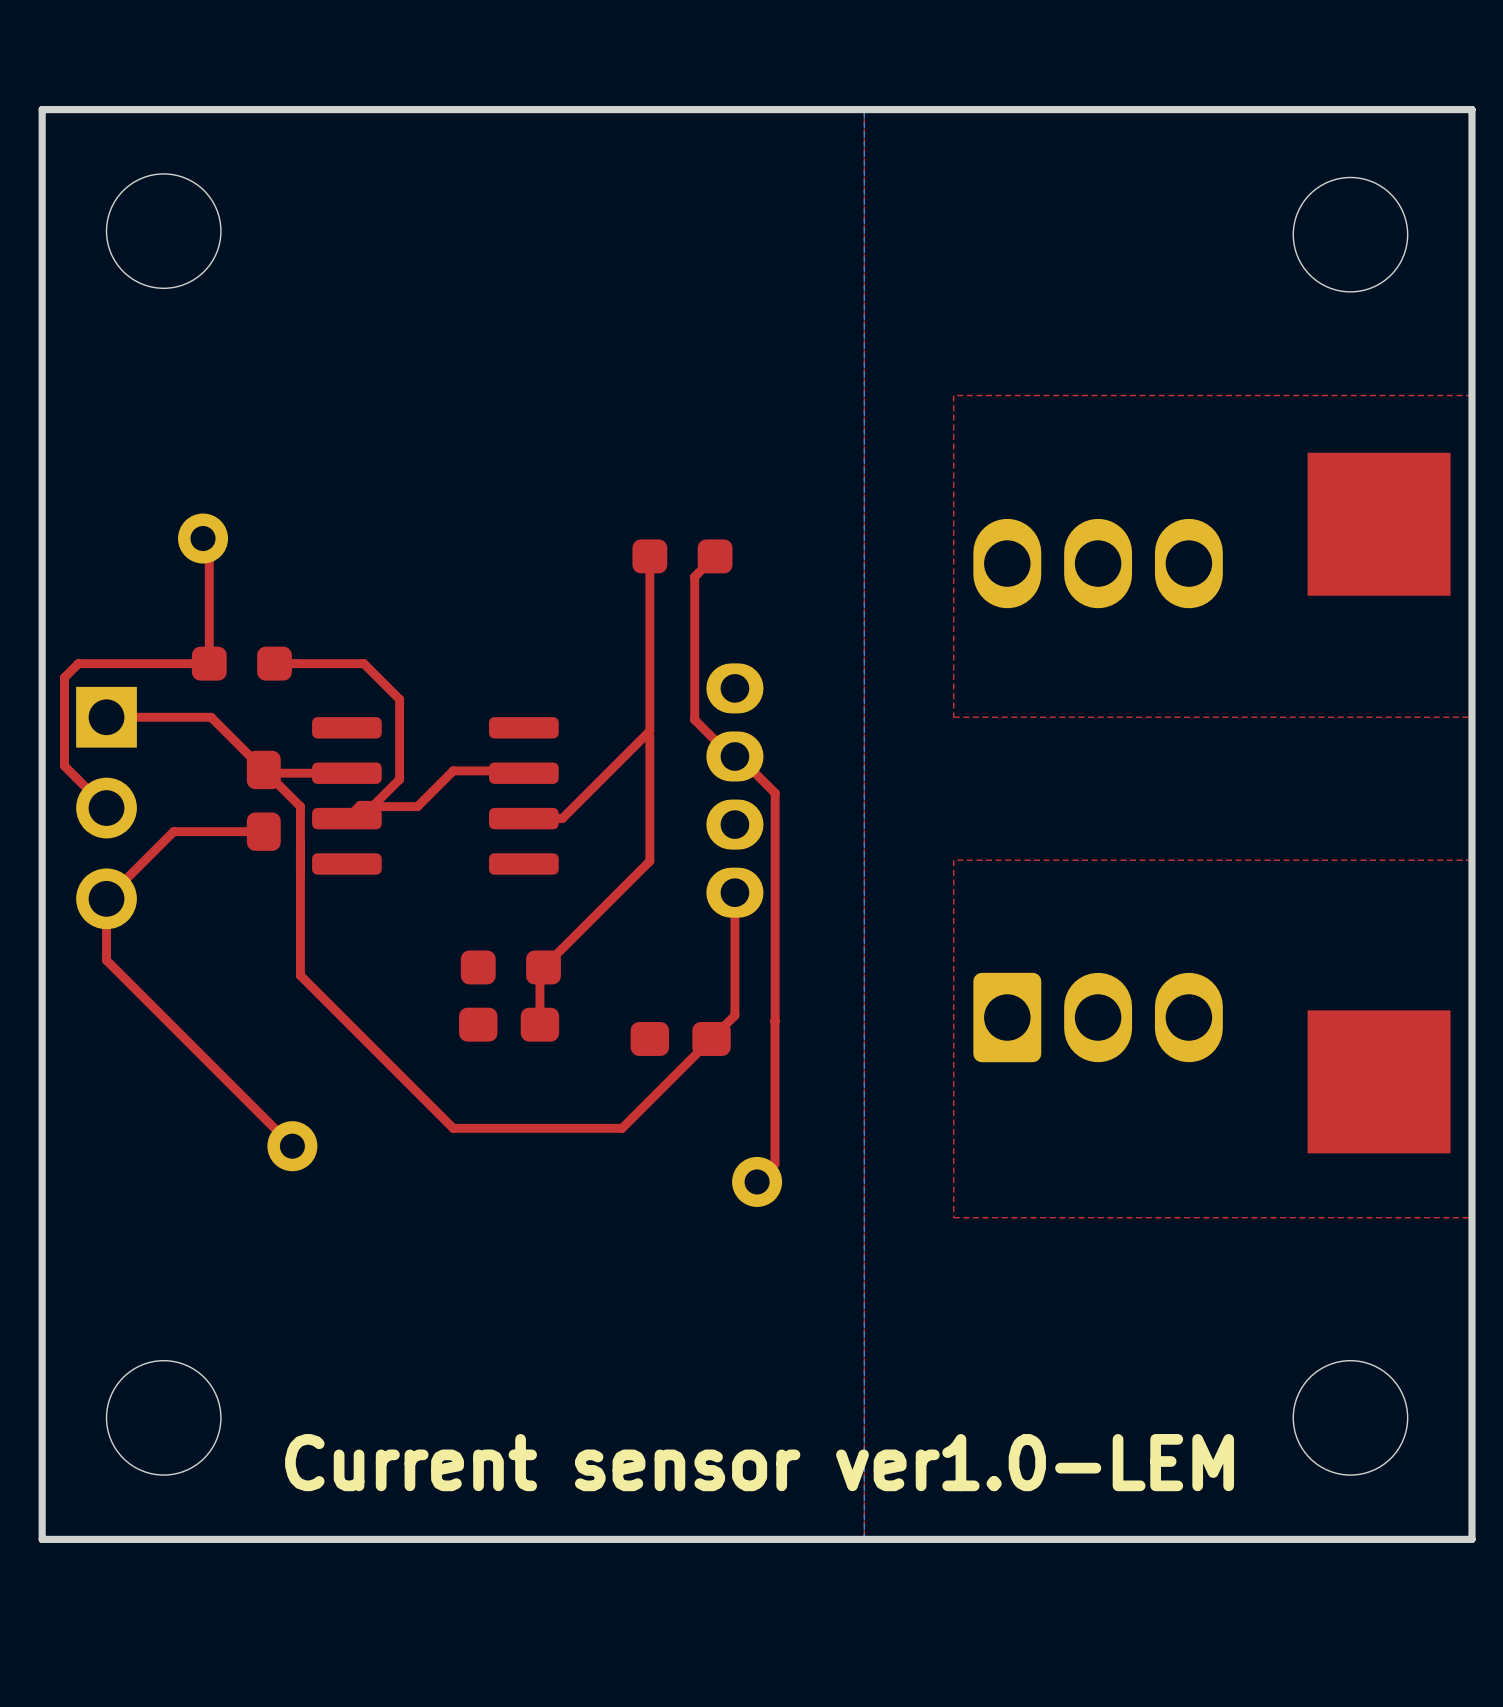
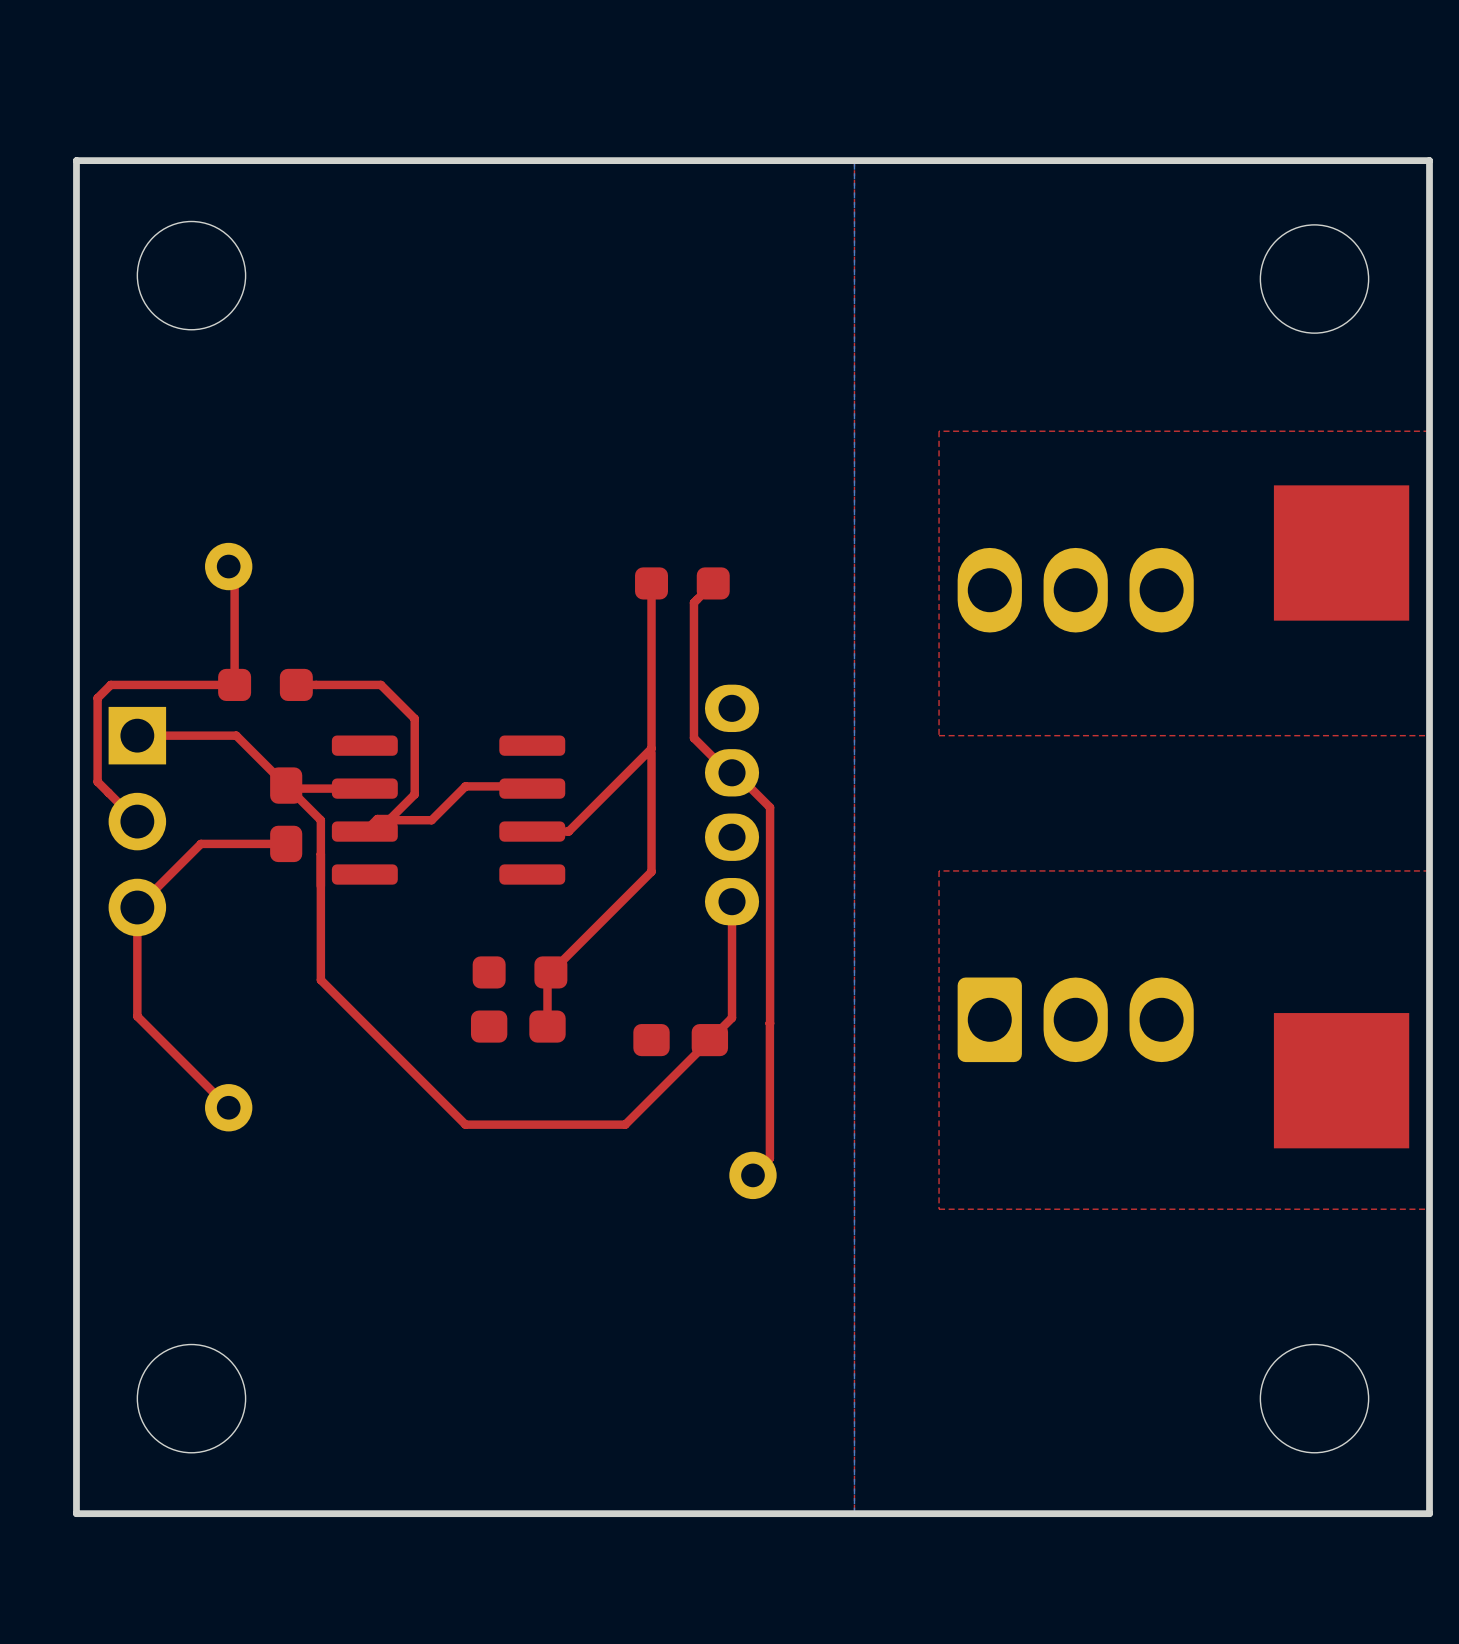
top track: (106, 960) (292, 1146) -> (137, 965) (137, 1016) (228, 1107)
part position: (292, 1146) -> (228, 1107)
text: Current sensor ver1.0-LEM (759, 1462) -> none

